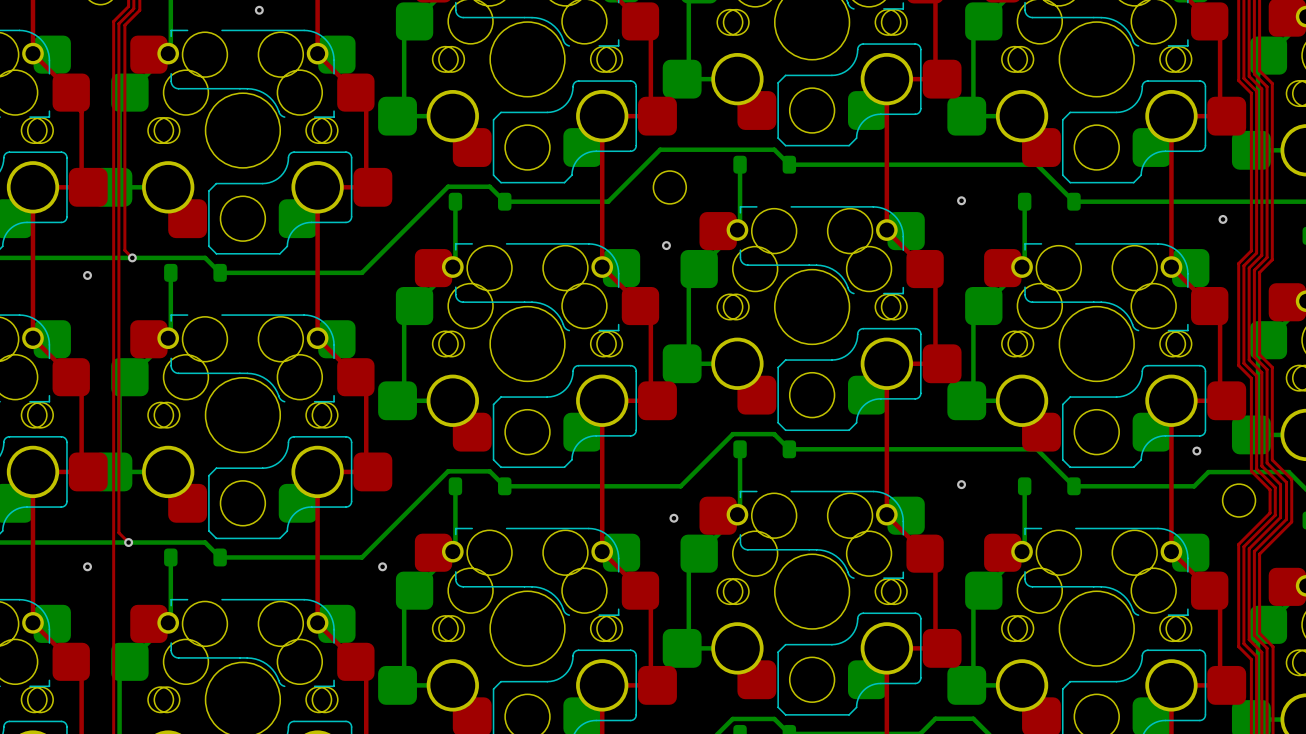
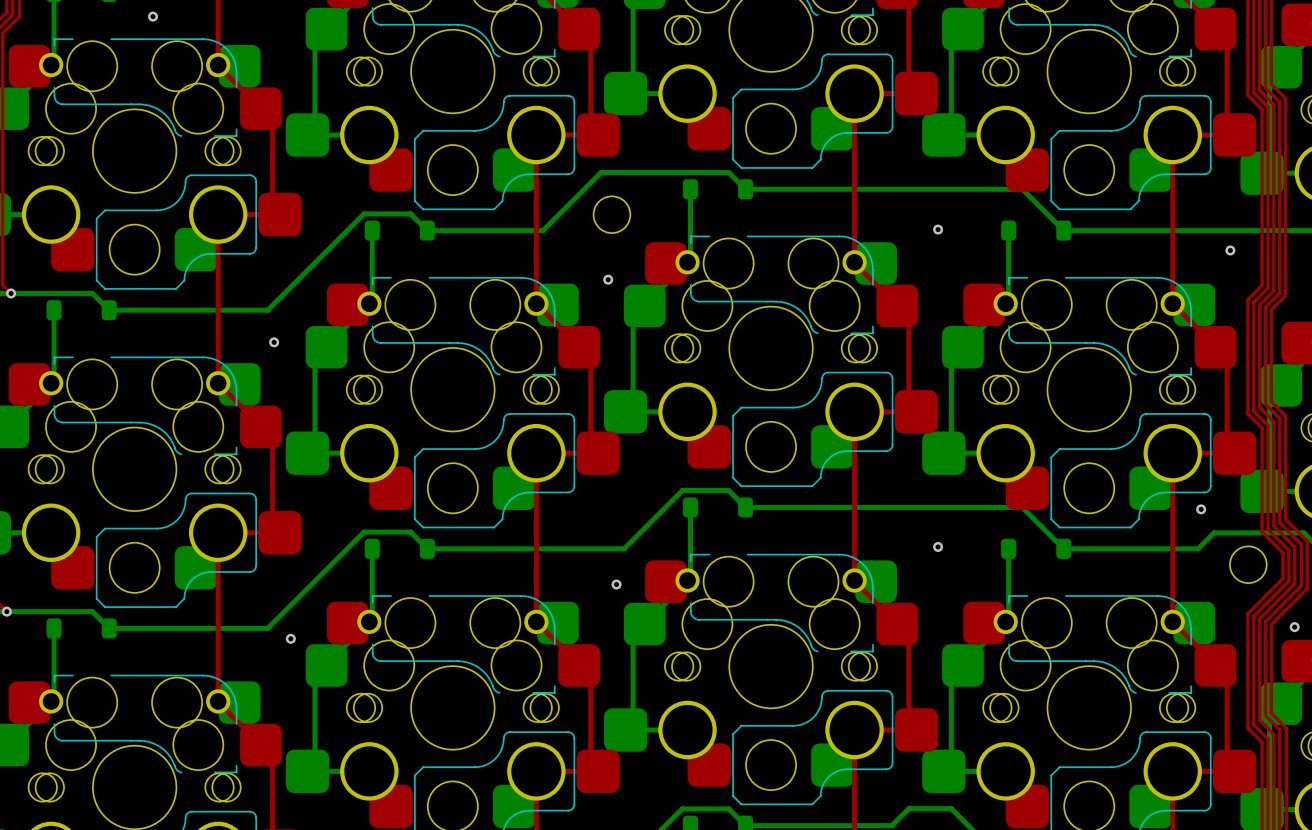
via: none -> (274, 342)
via: none -> (1294, 627)

